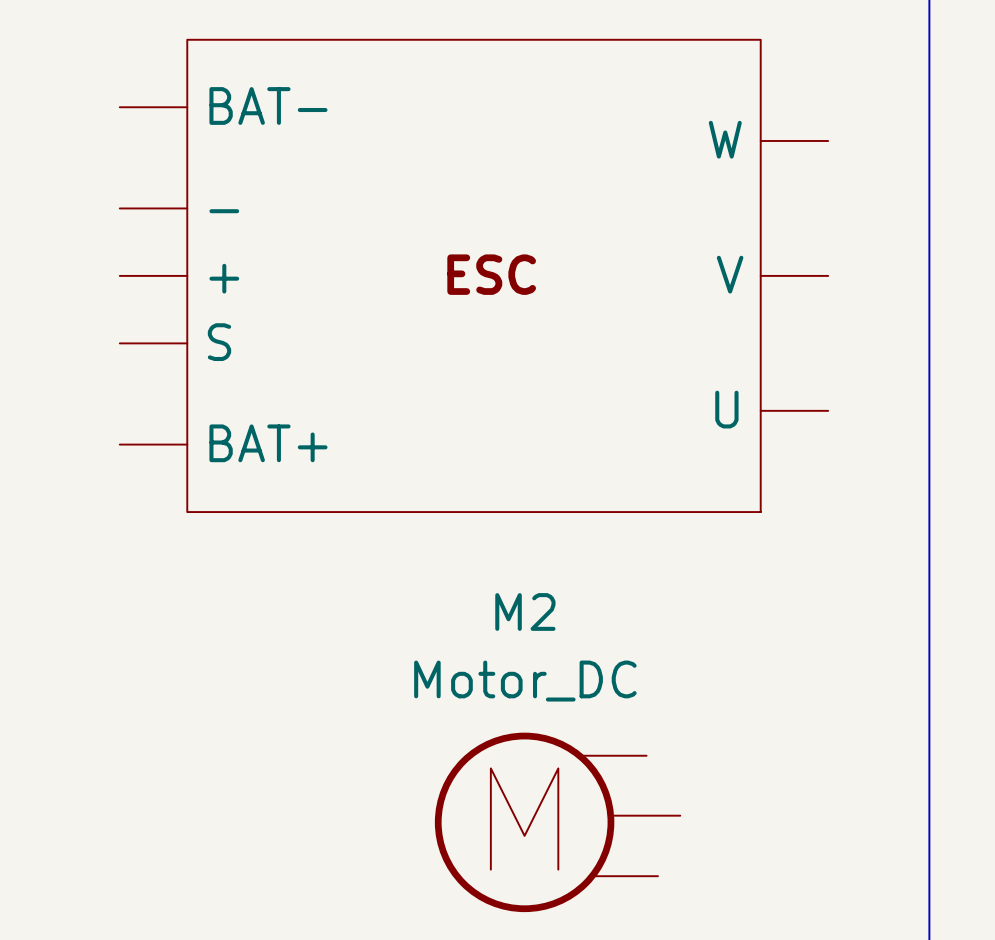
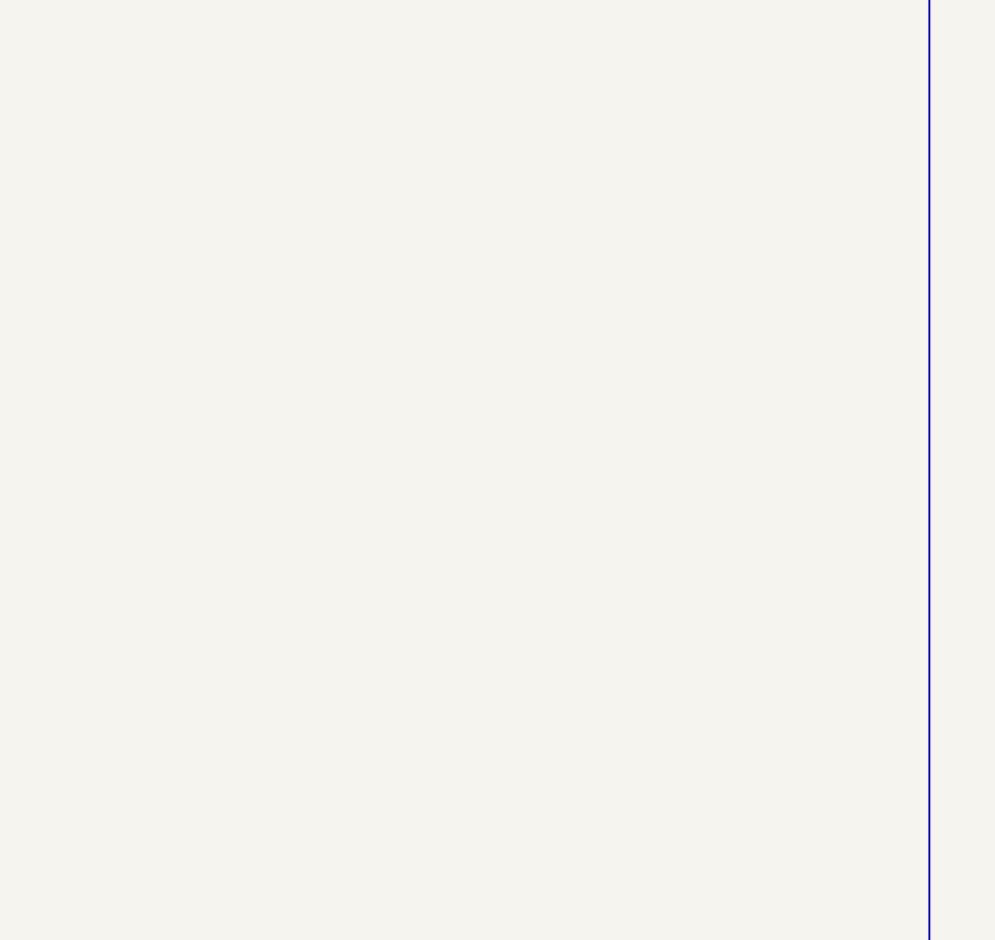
part: (473, 275) -> none
M2: Motor_DC (557, 822) -> none

